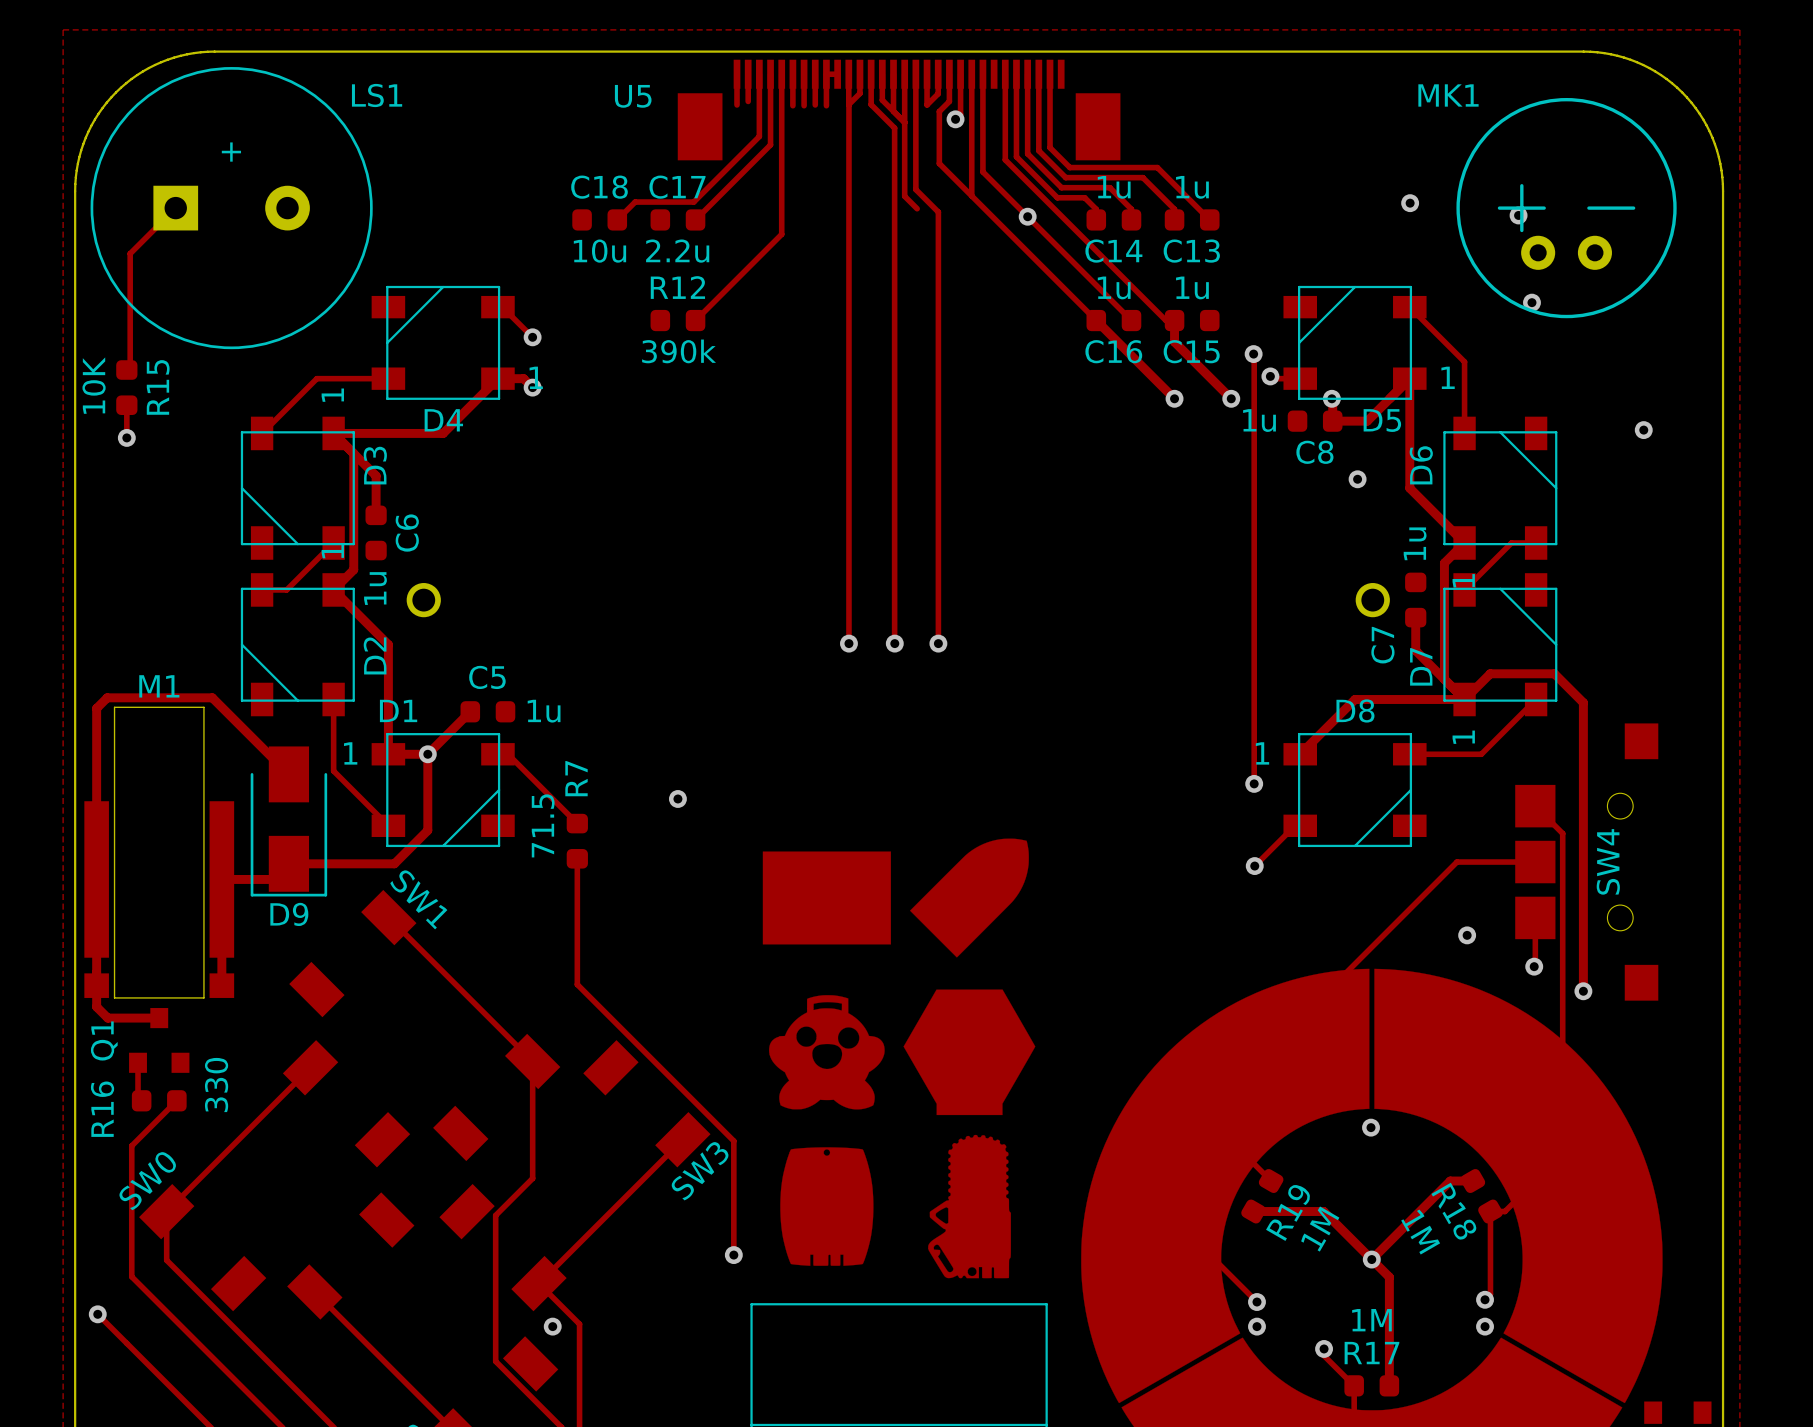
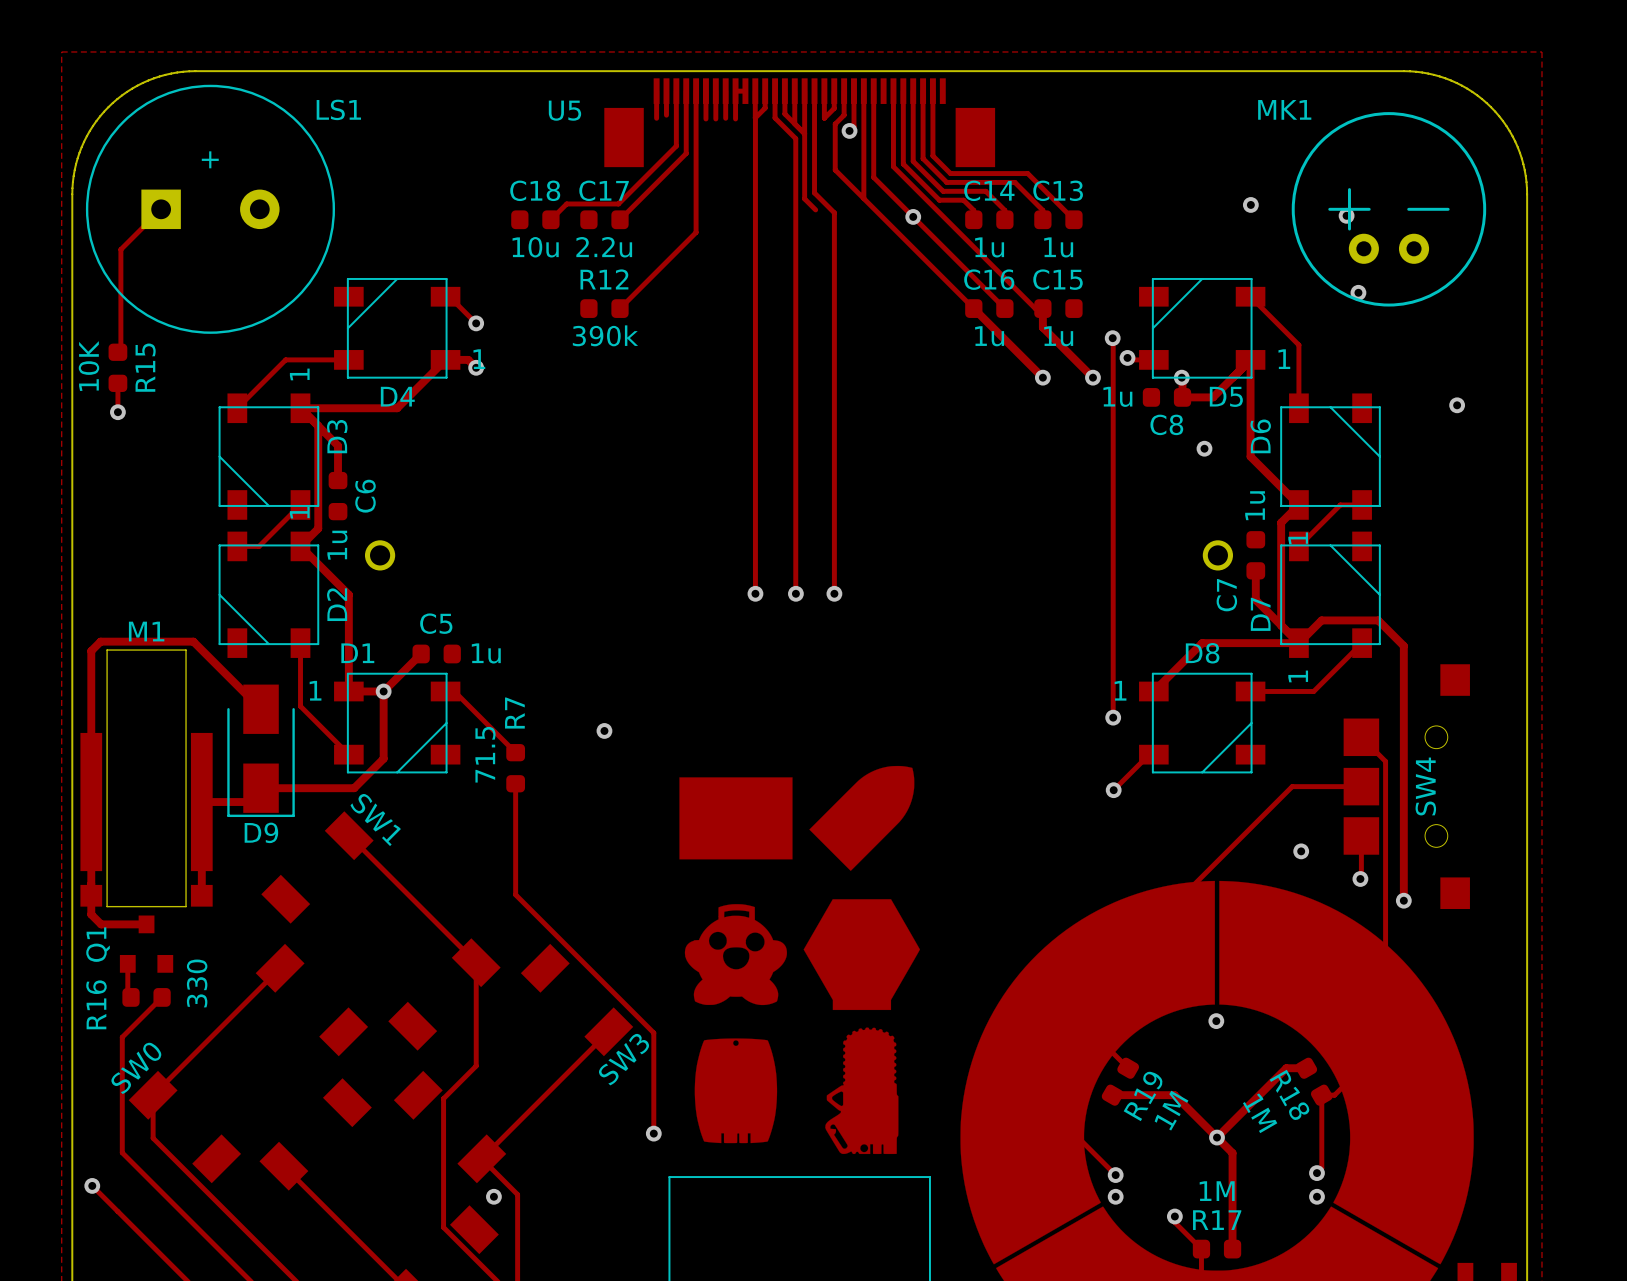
C14 value position: 1u (1114, 187) -> 1u (989, 247)
C13 value position: 1u (1192, 187) -> 1u (1058, 247)
C14 name position: C14 (1113, 251) -> C14 (989, 190)
C13 name position: C13 (1191, 251) -> C13 (1058, 190)
C16 value position: 1u (1114, 287) -> 1u (989, 336)
C15 value position: 1u (1192, 287) -> 1u (1058, 336)
C16 name position: C16 (1113, 351) -> C16 (989, 279)
C15 name position: C15 (1191, 351) -> C15 (1058, 279)

